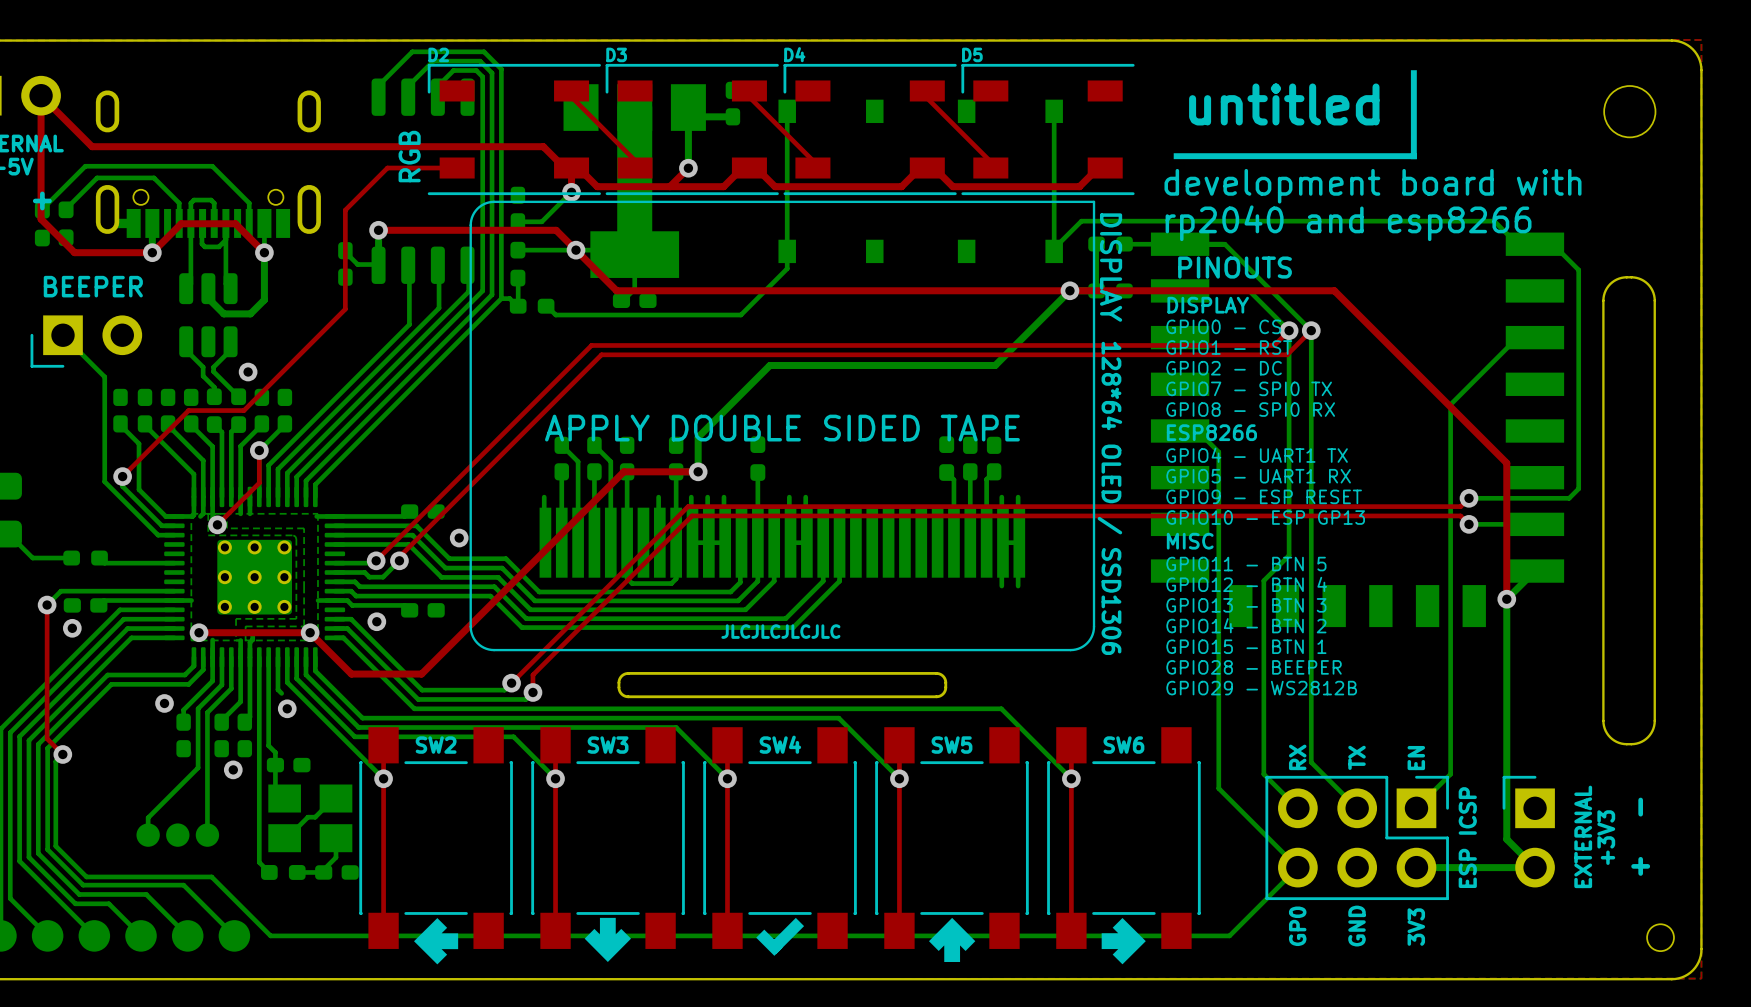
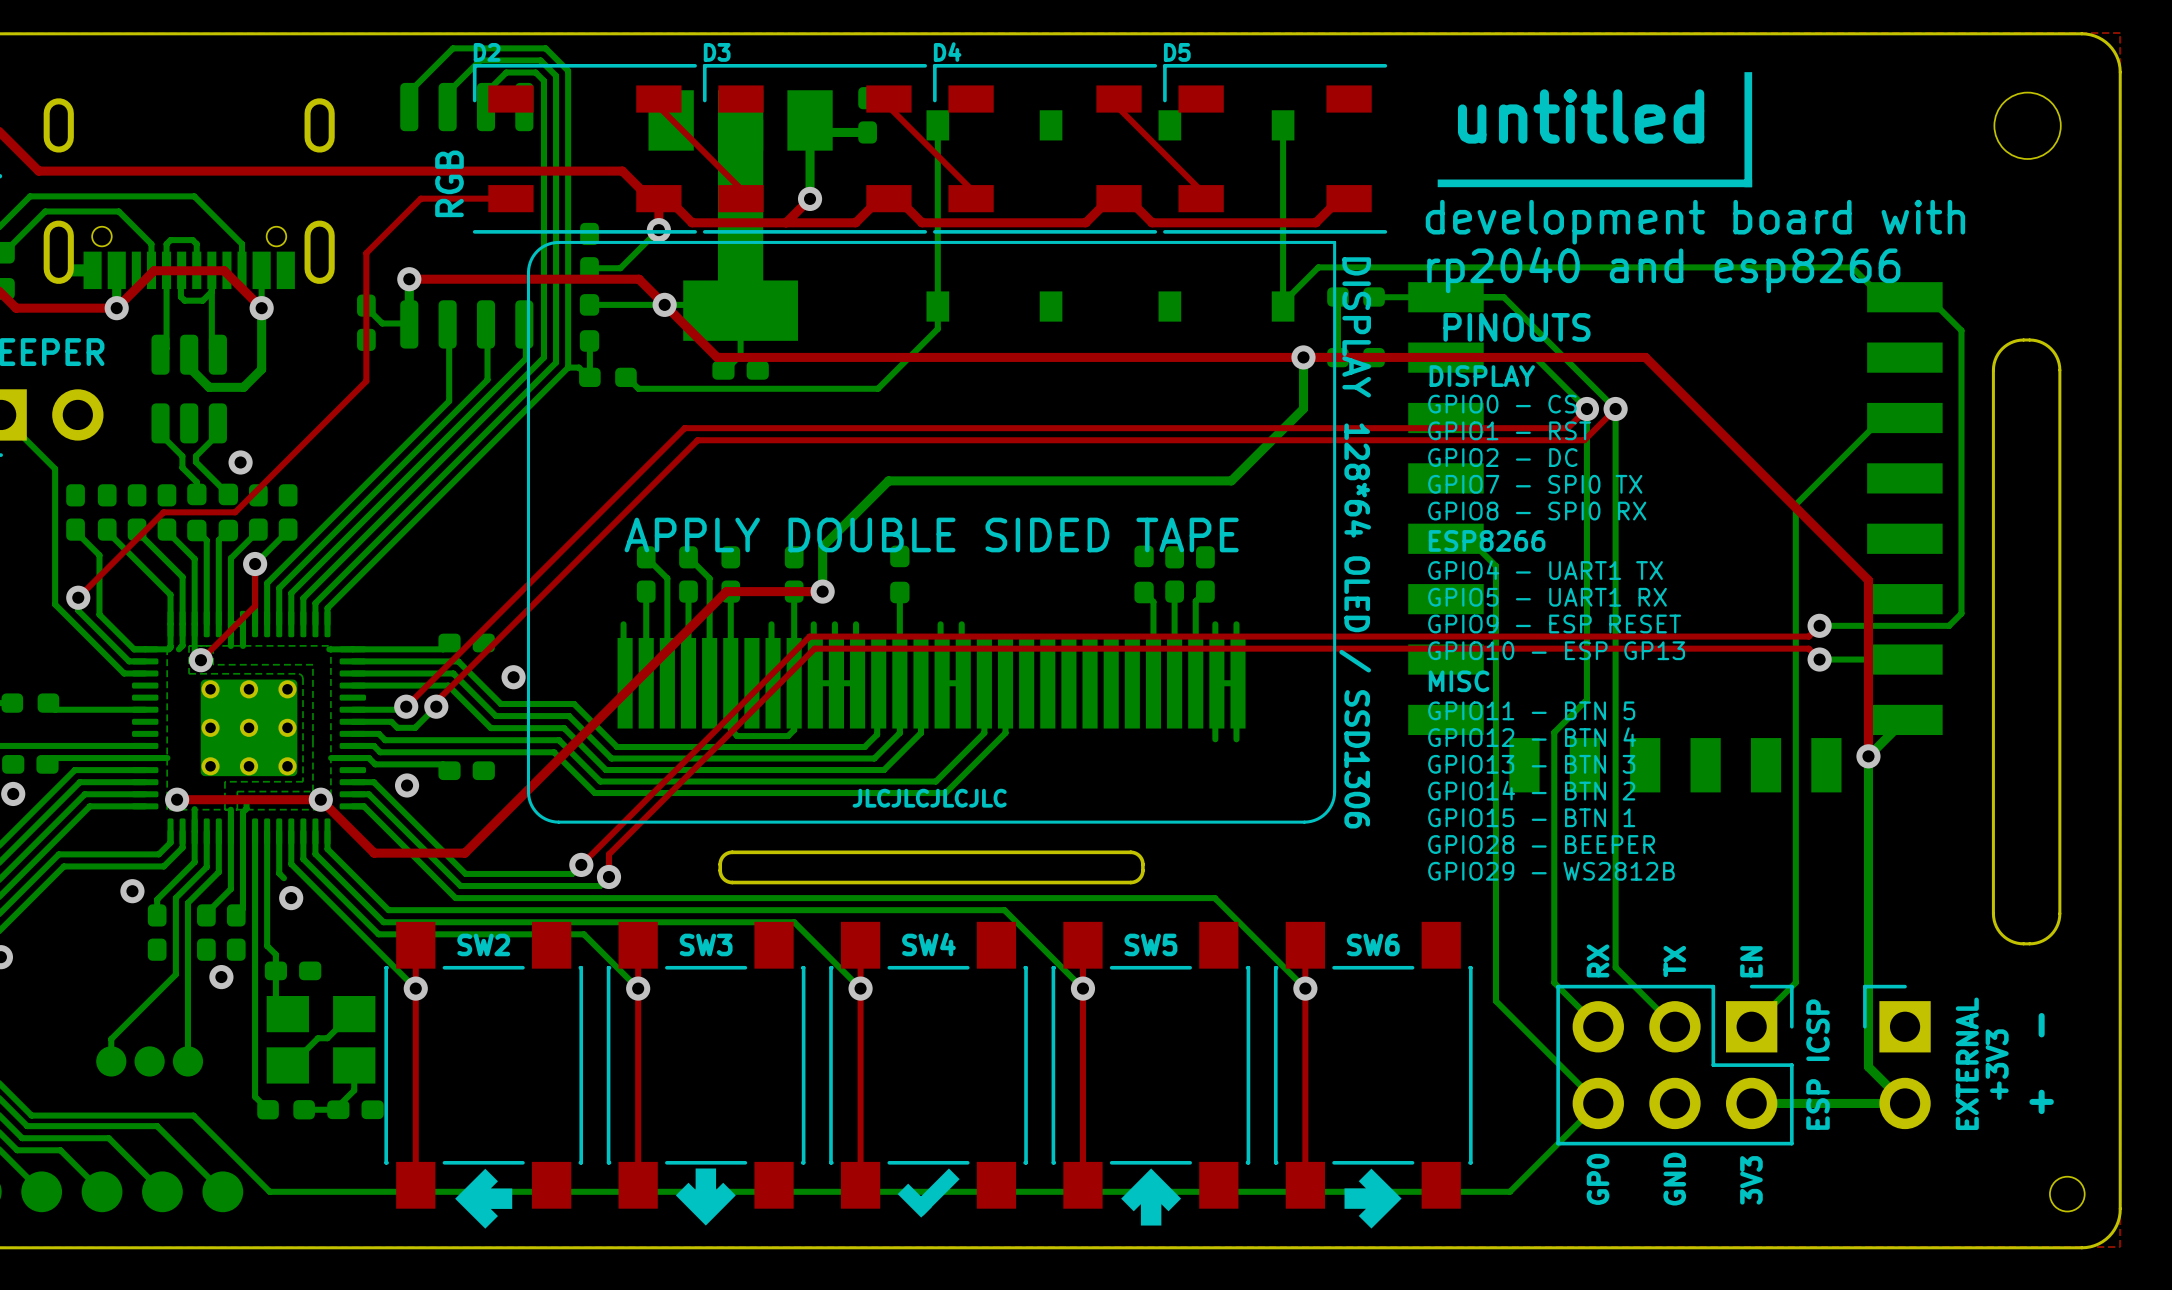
text position: untitled (1284, 104) -> untitled (1581, 116)
bottom track: (1069, 290) (995, 365) (769, 365) (749, 386) -> (1303, 357) (1303, 408) (1231, 480) (888, 480)

